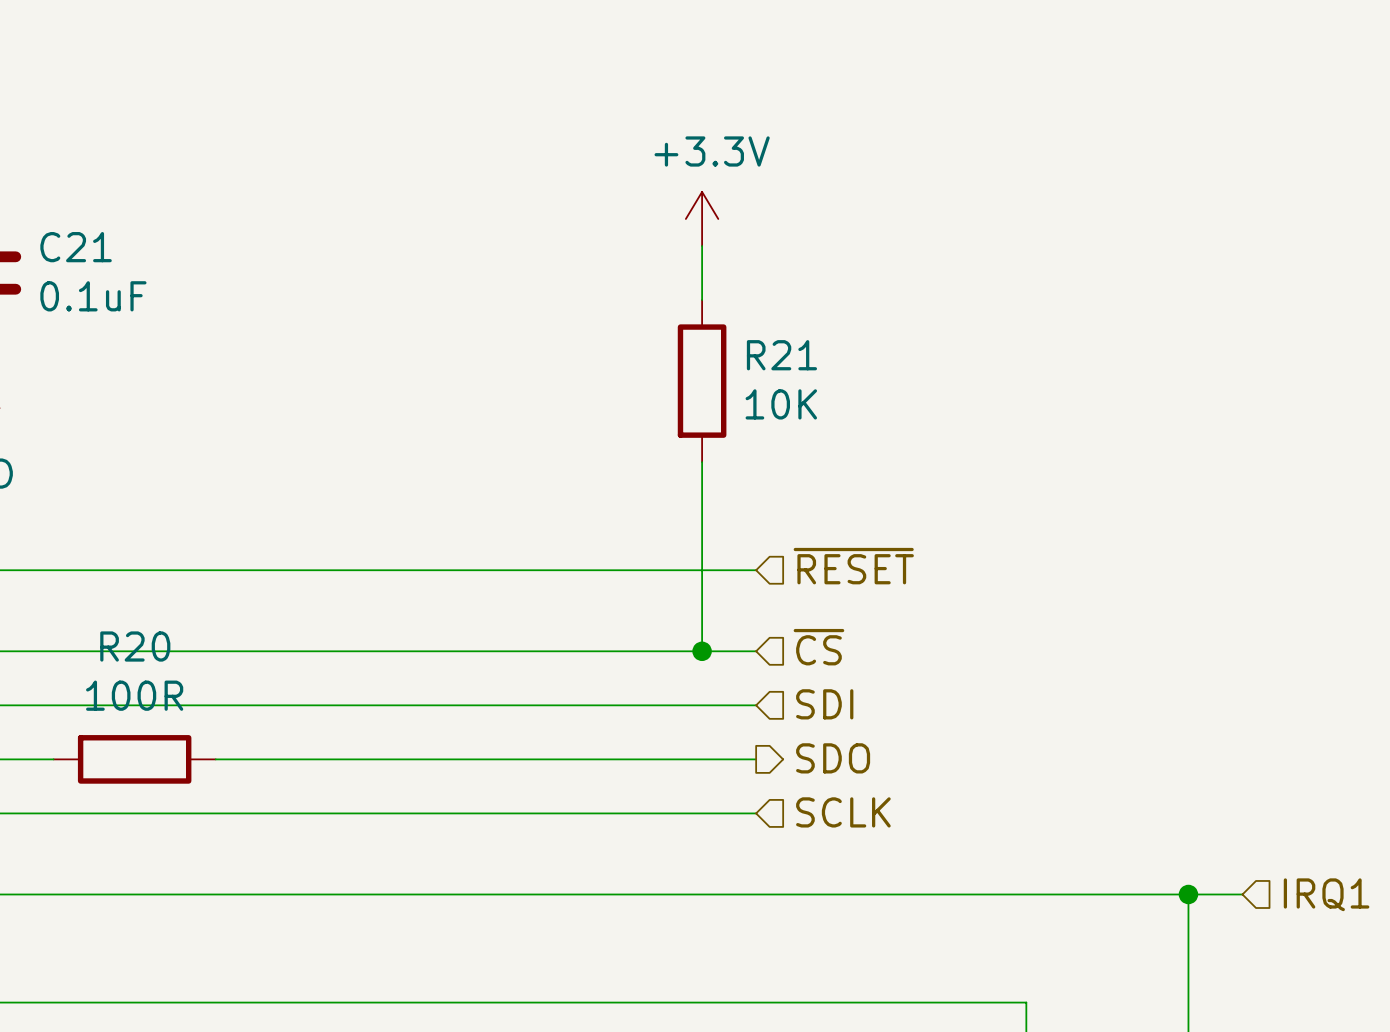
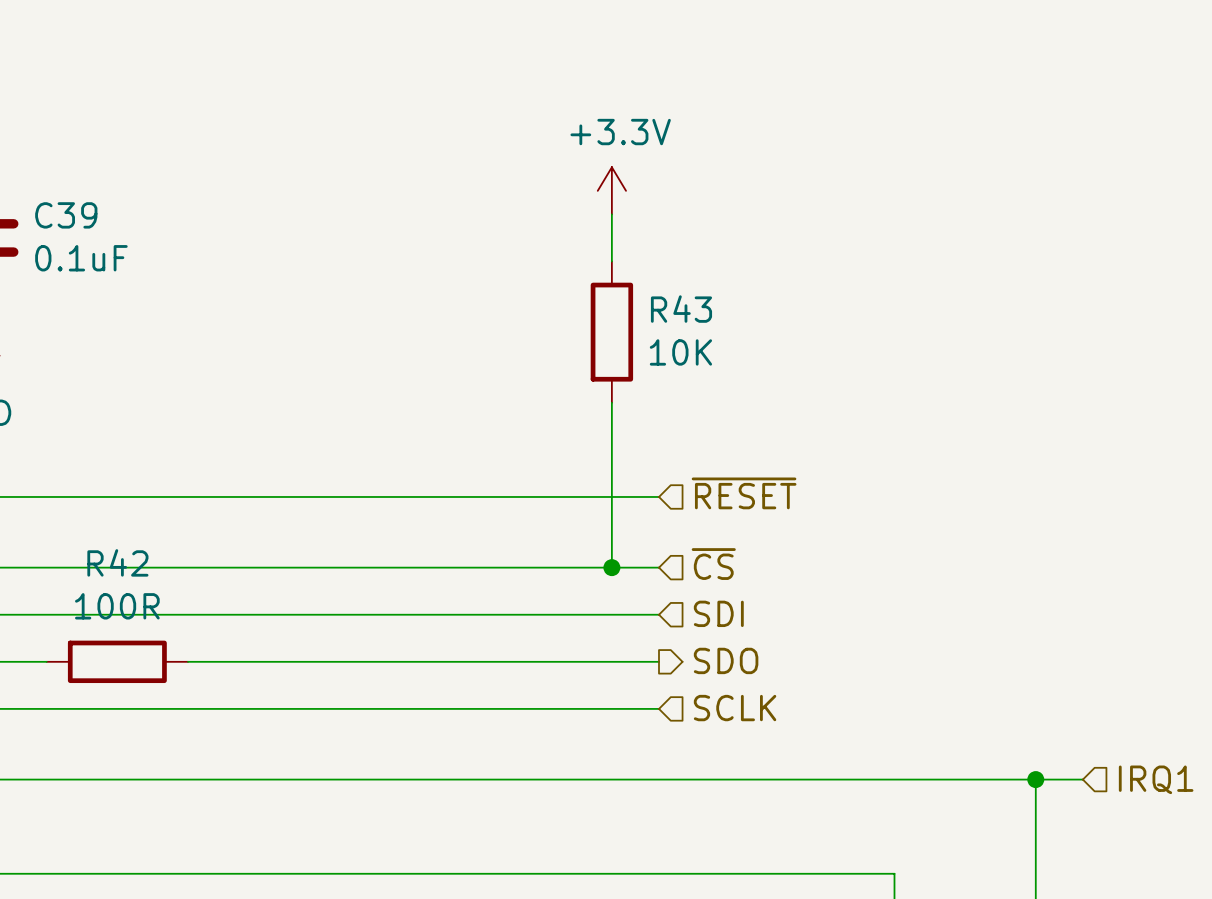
C21 name: C21 (76, 247) -> C39 (66, 215)
R21 name: R21 (781, 355) -> R43 (681, 309)
R20 name: R20 (135, 646) -> R42 (117, 562)

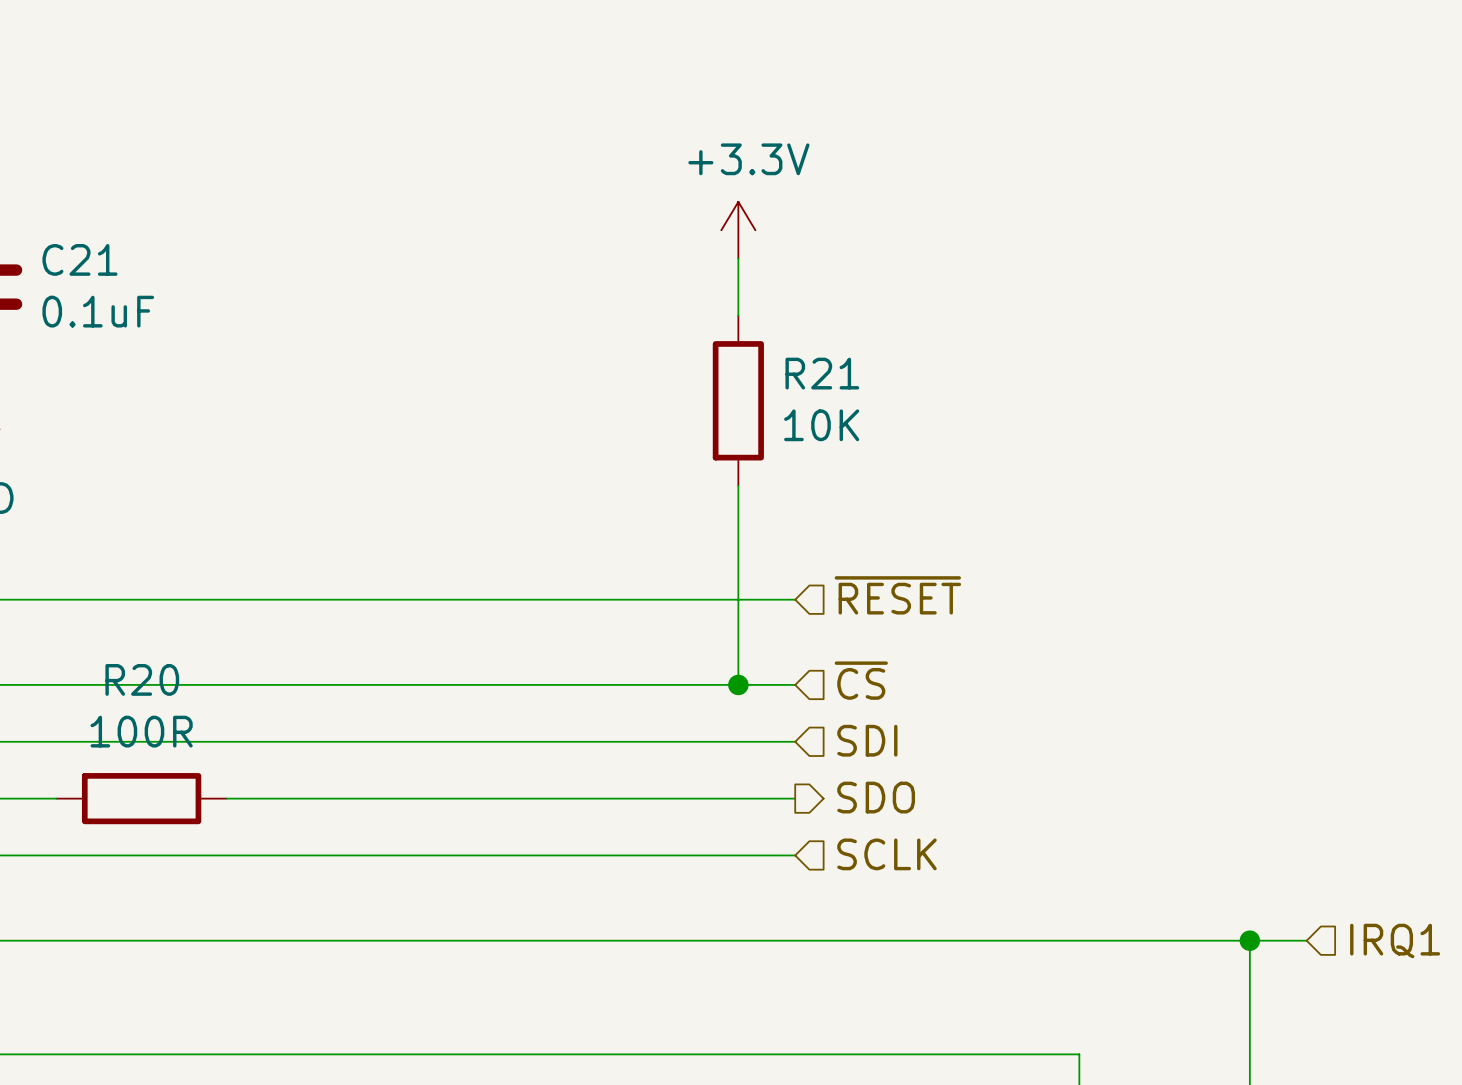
C39 name: C39 (66, 215) -> C21 (79, 259)
R43 name: R43 (681, 309) -> R21 (822, 373)
R42 name: R42 (117, 562) -> R20 (142, 679)

